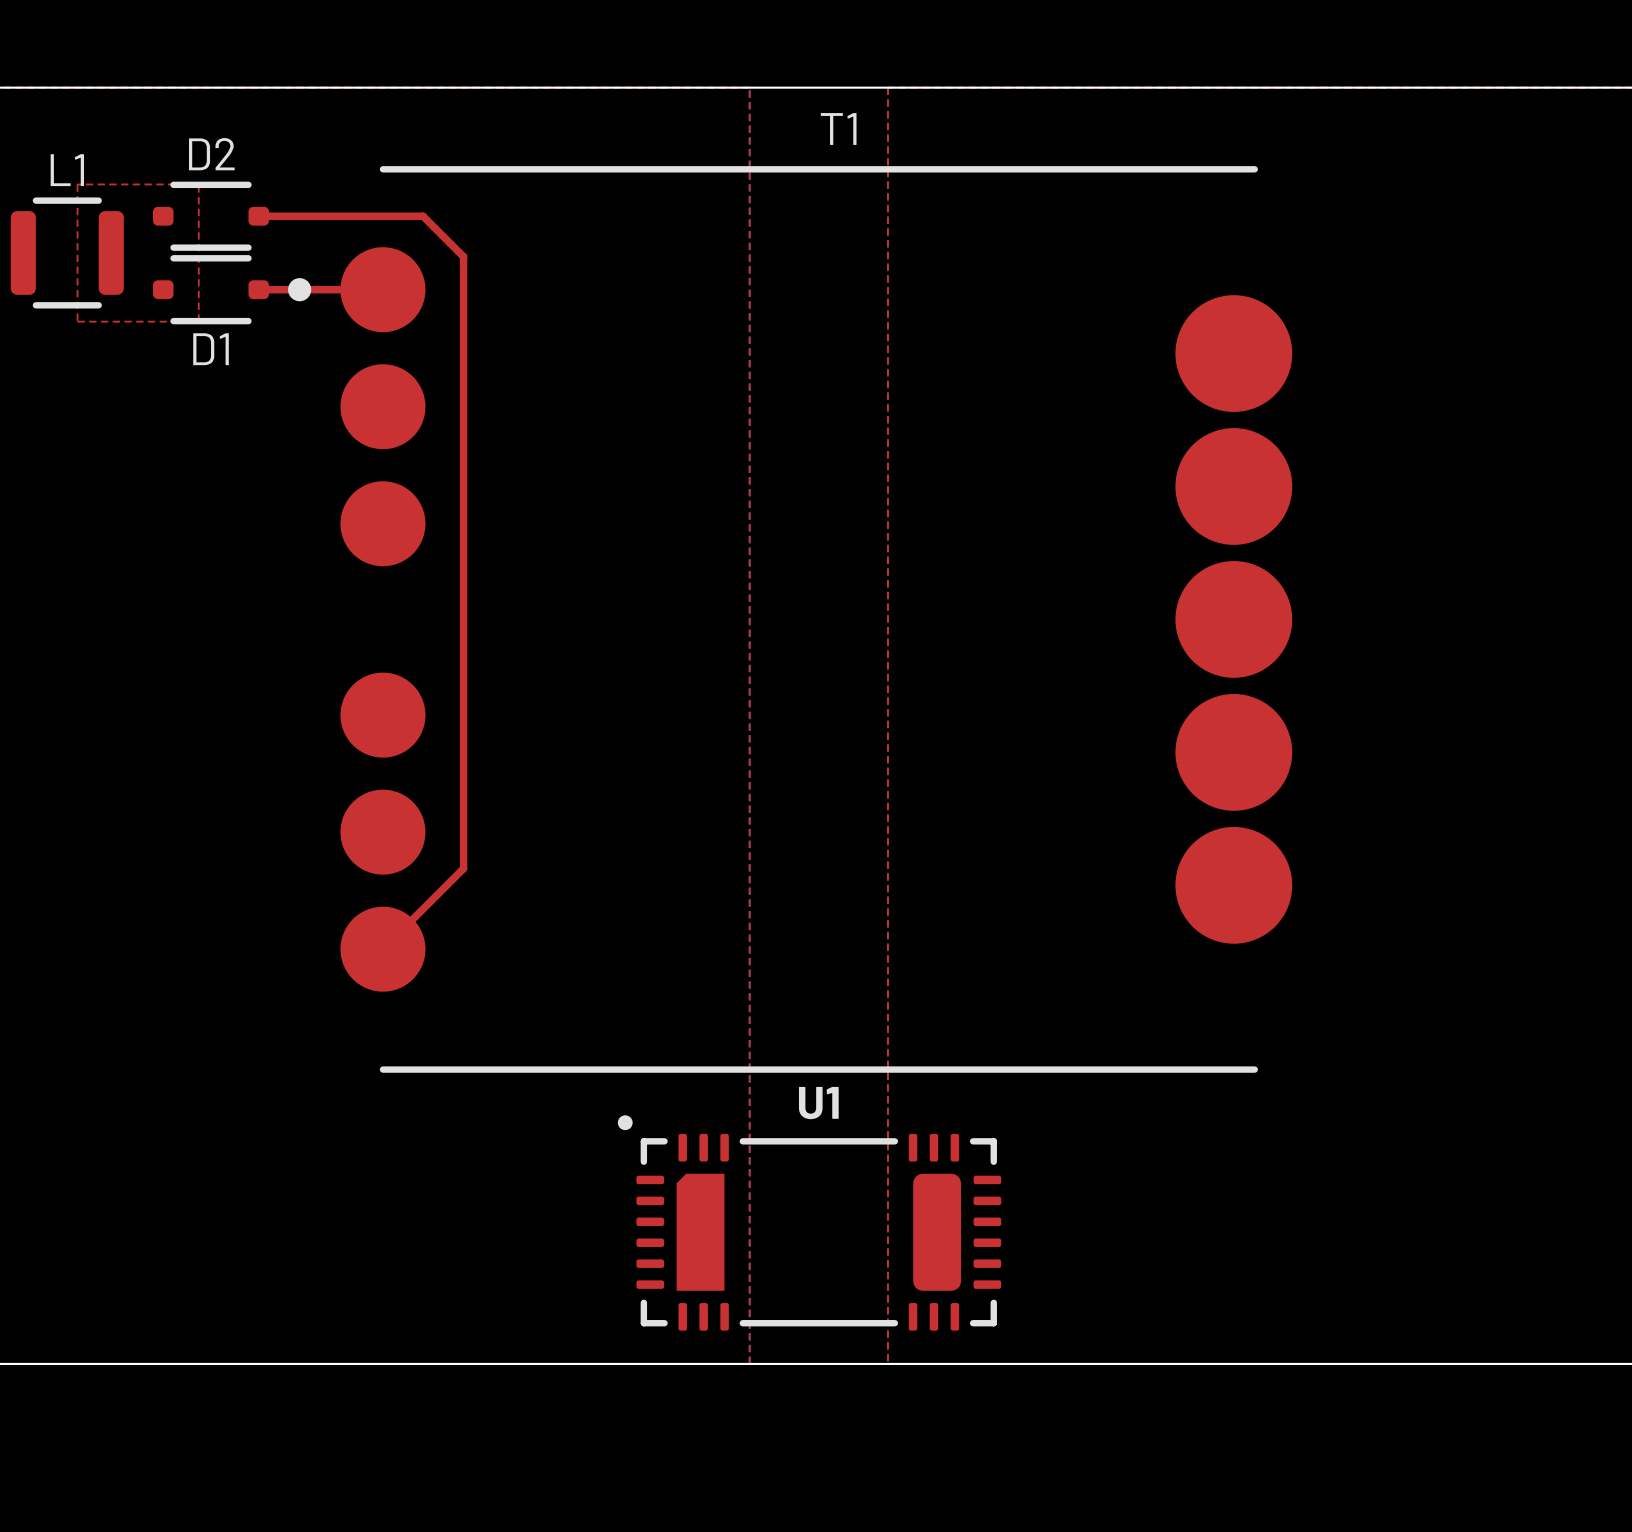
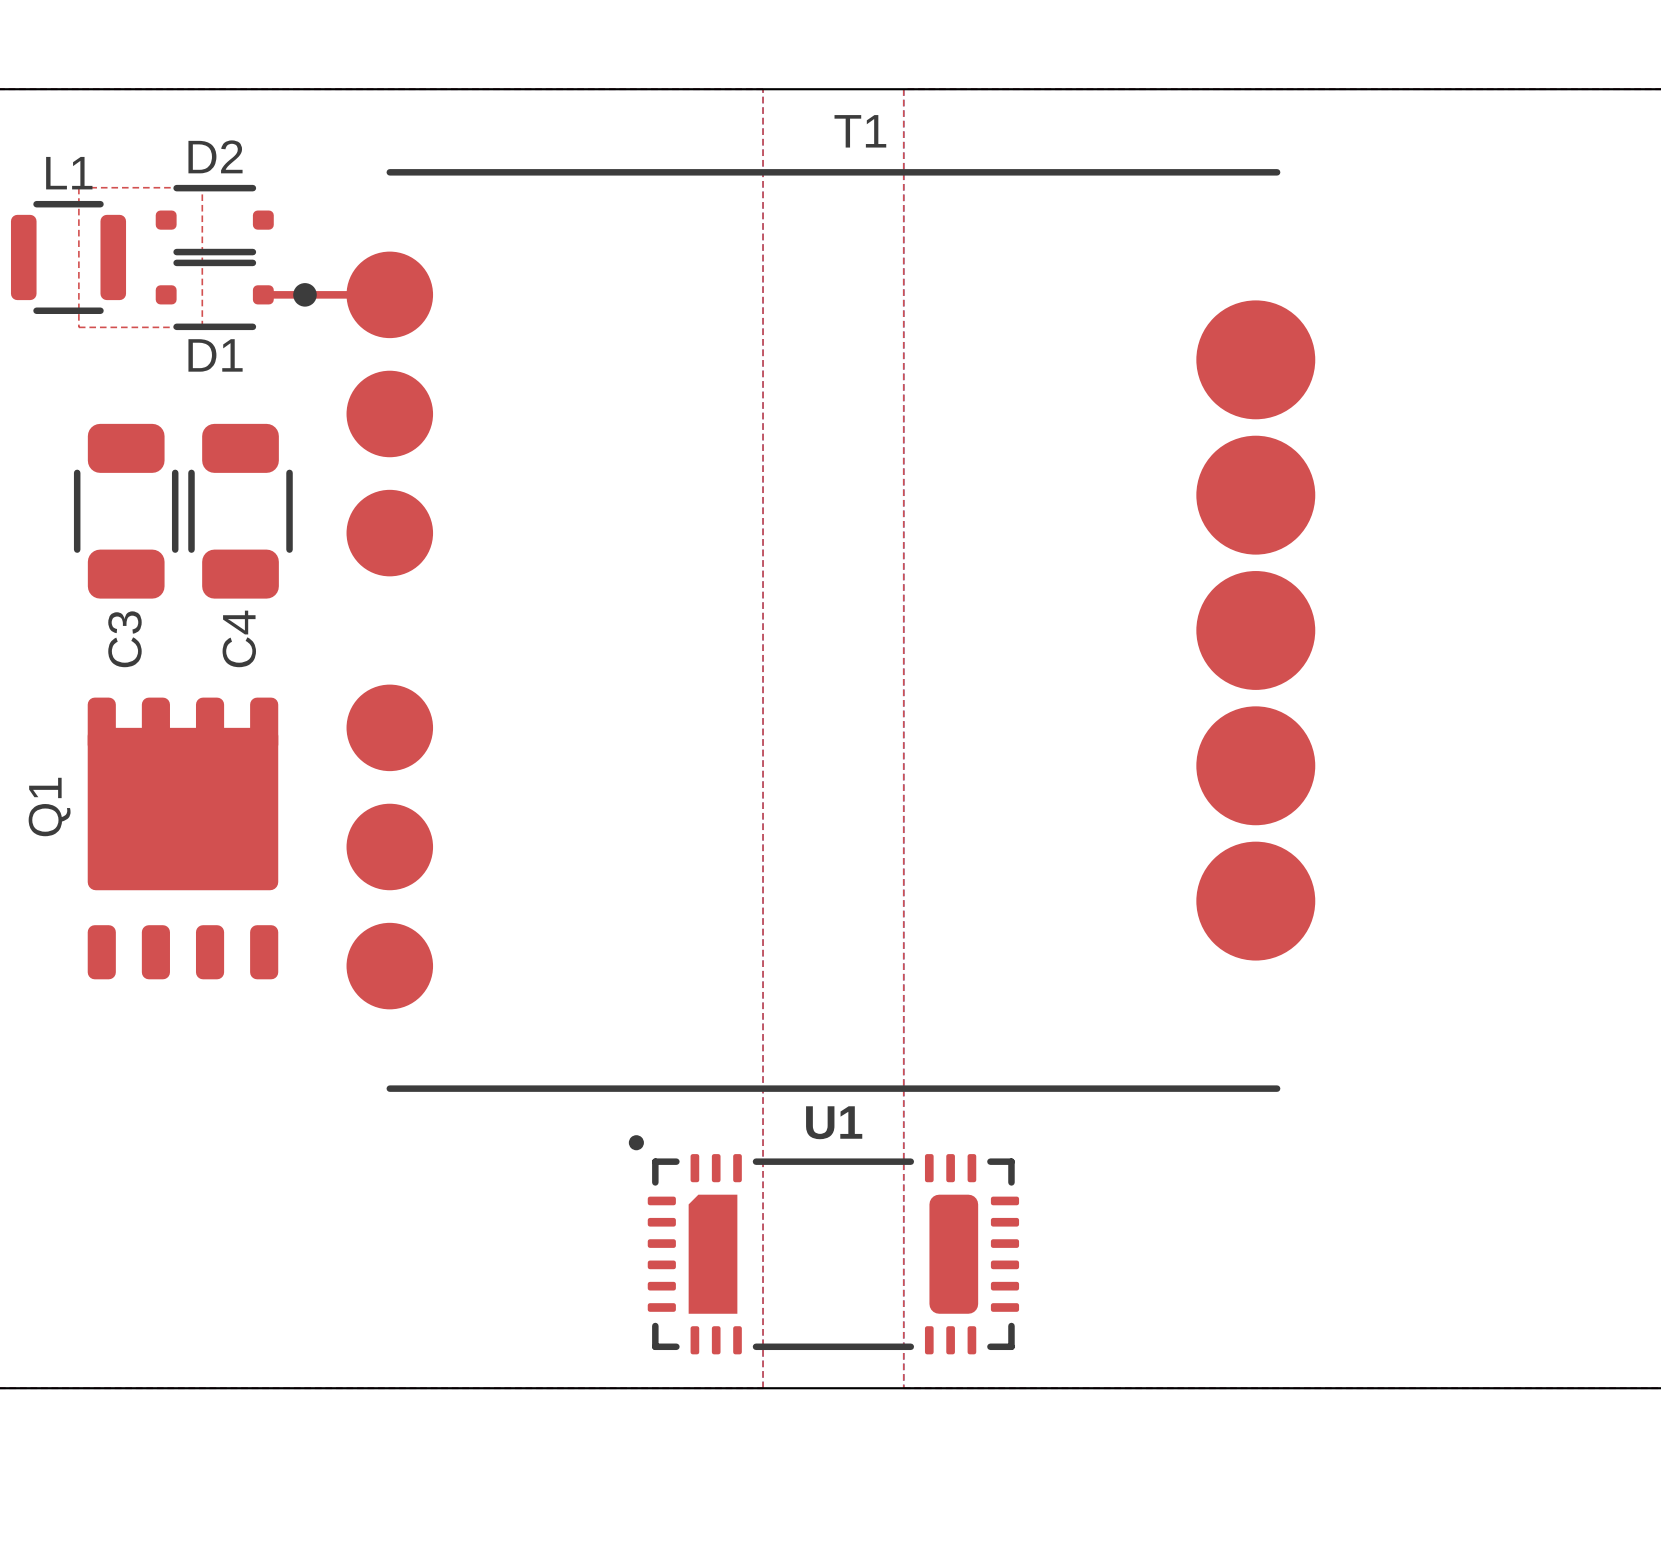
top track: (258, 216) (423, 216) (463, 256) (463, 868) (382, 949) -> none
C3: none -> (126, 511)
C4: none -> (240, 511)
Q1: none -> (182, 838)

